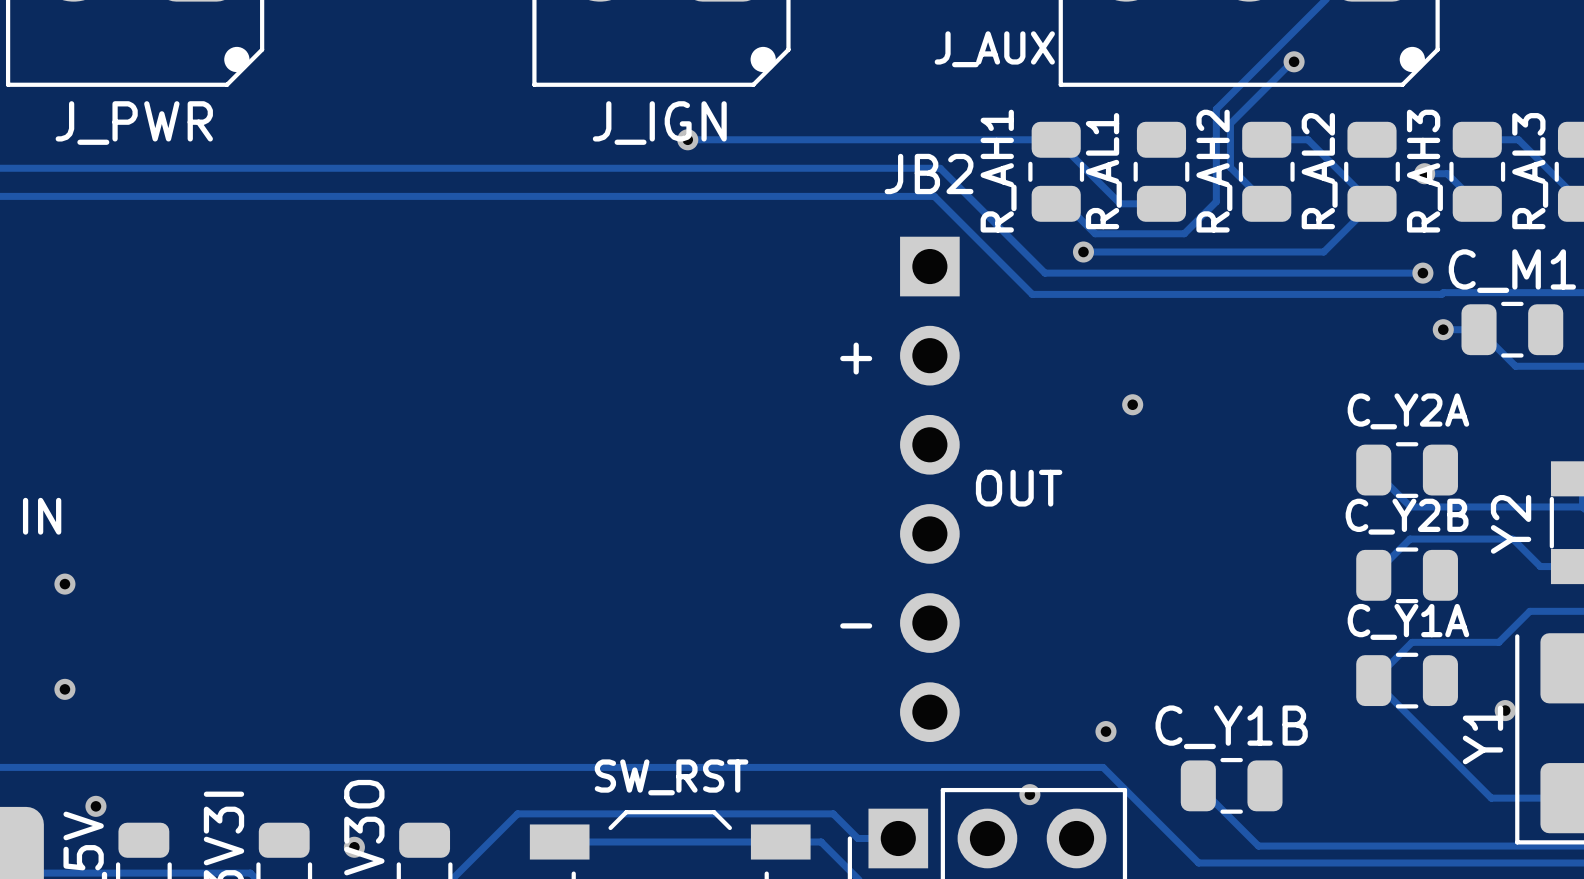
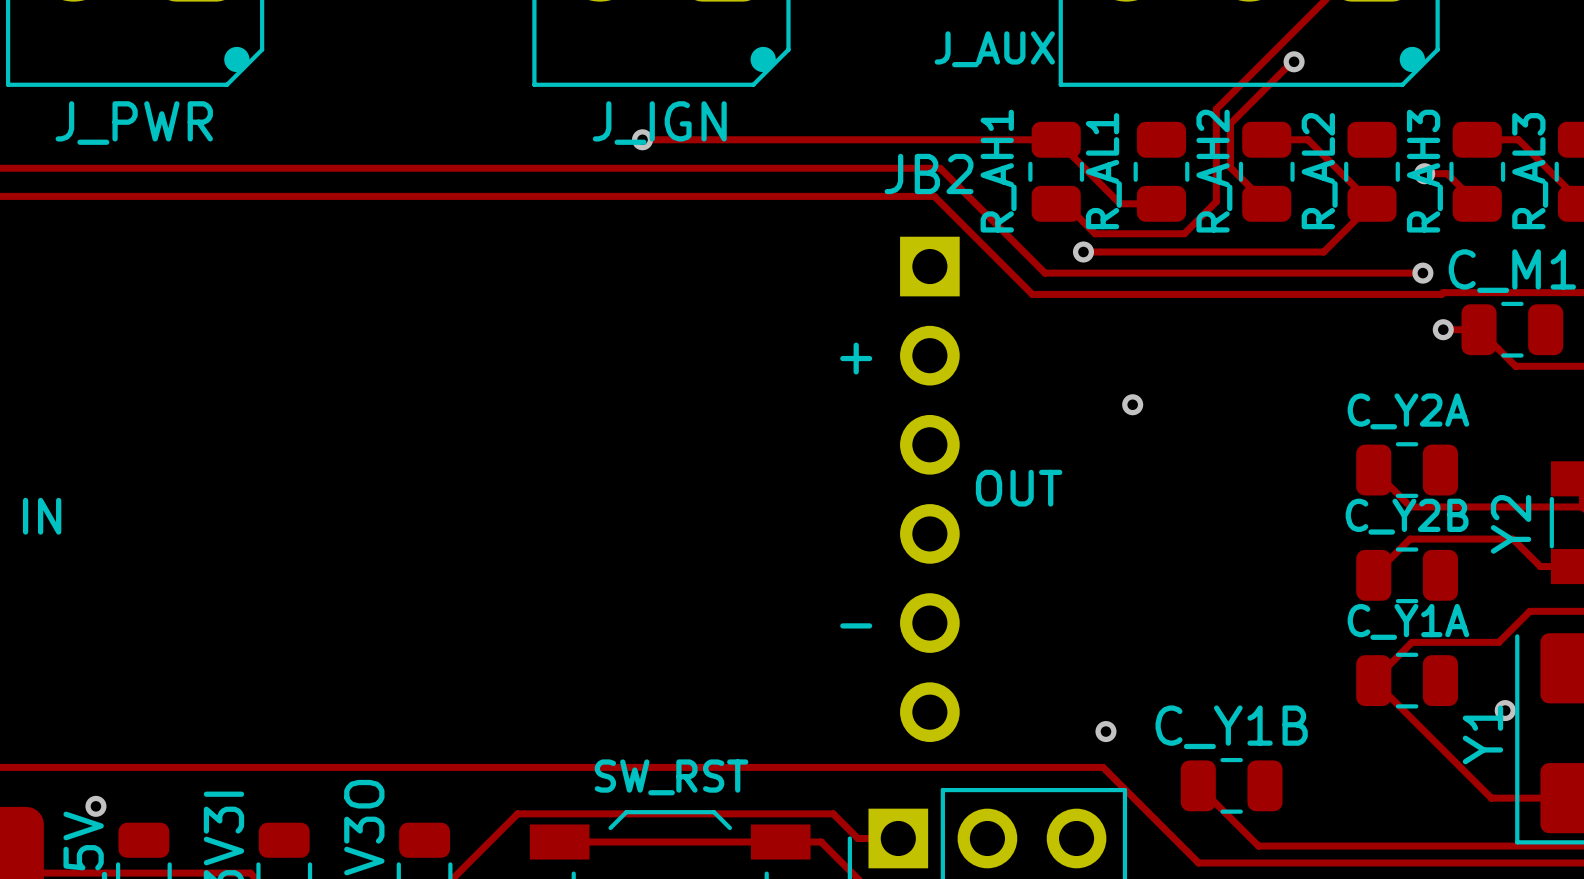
track: none -> (642, 139) (687, 139)
via position: (687, 139) -> (642, 139)
via: (64, 584) -> none
via: (64, 689) -> none
via: (1029, 794) -> none
via: (354, 847) -> none

